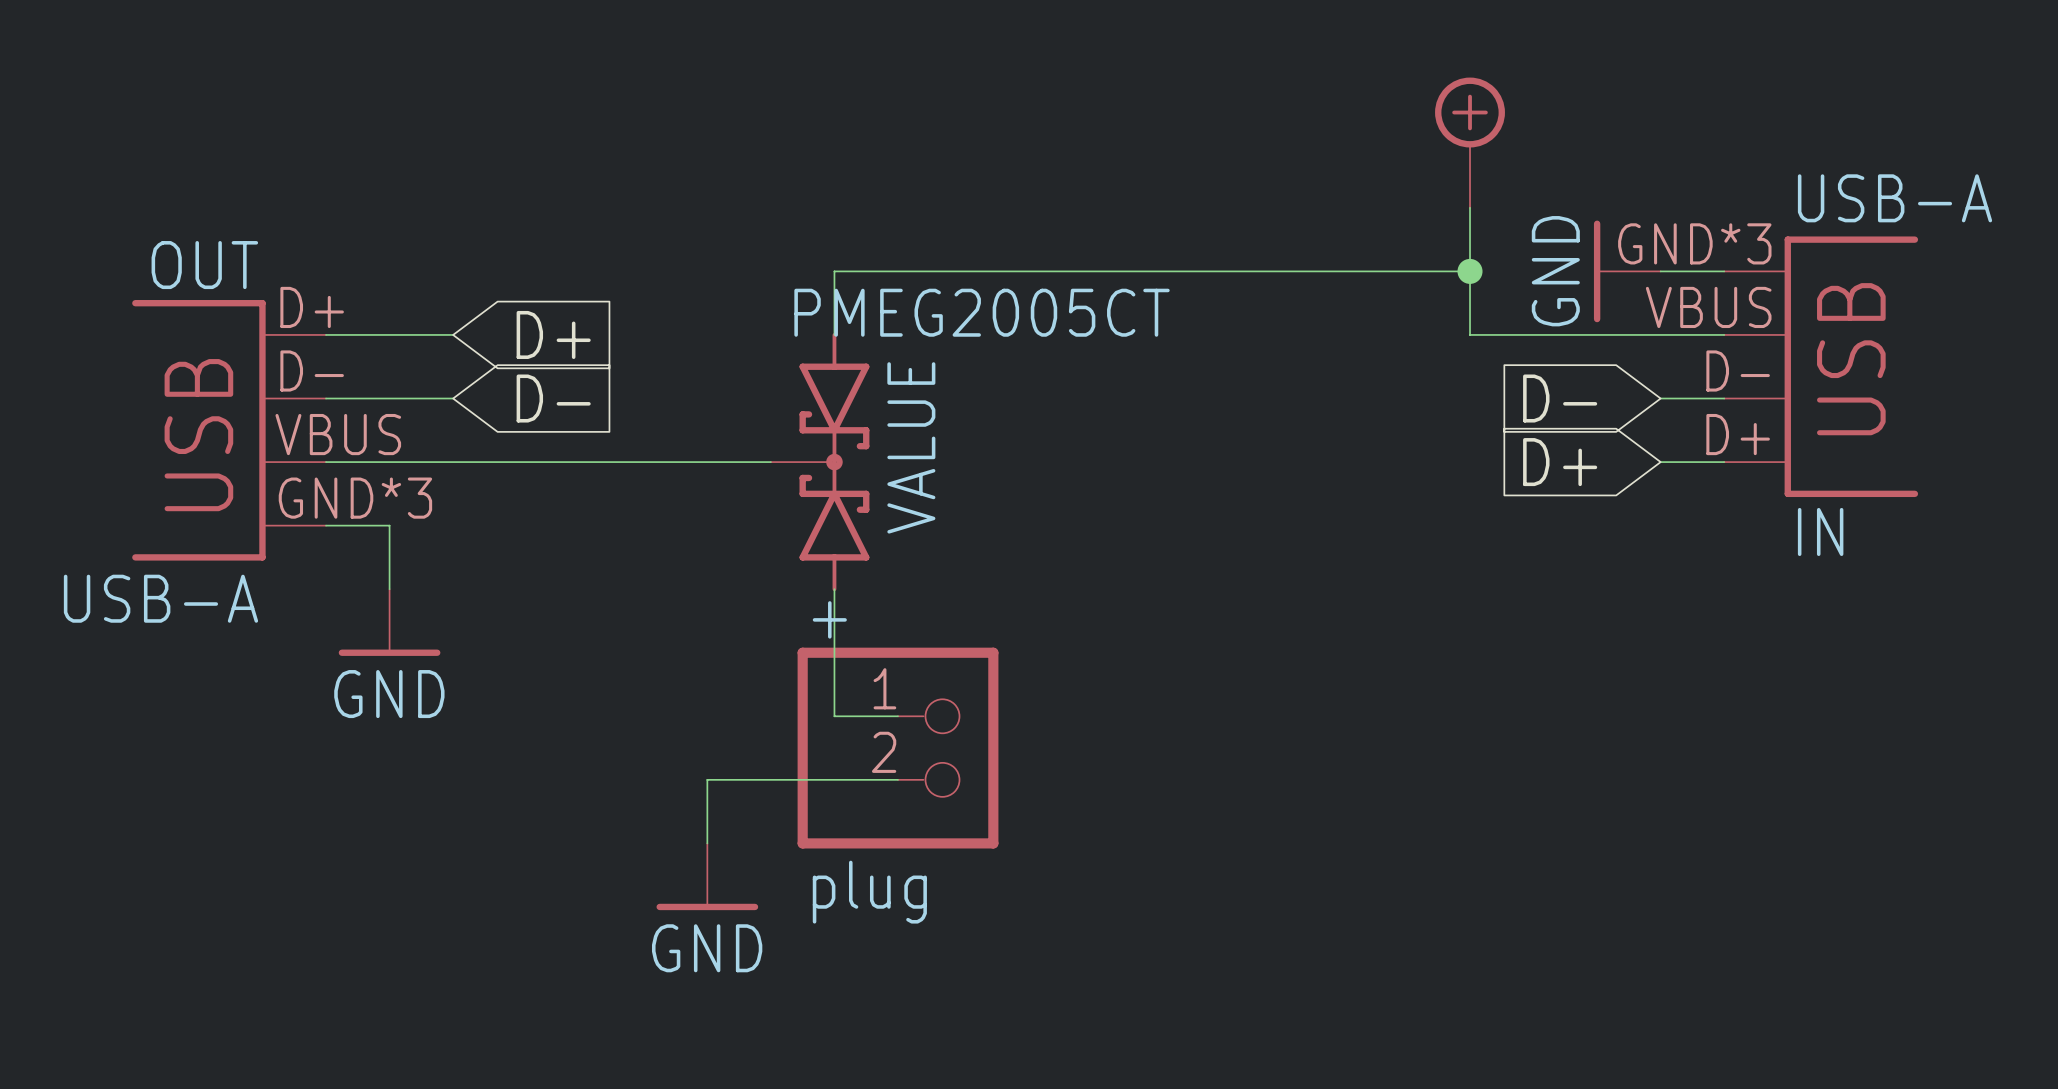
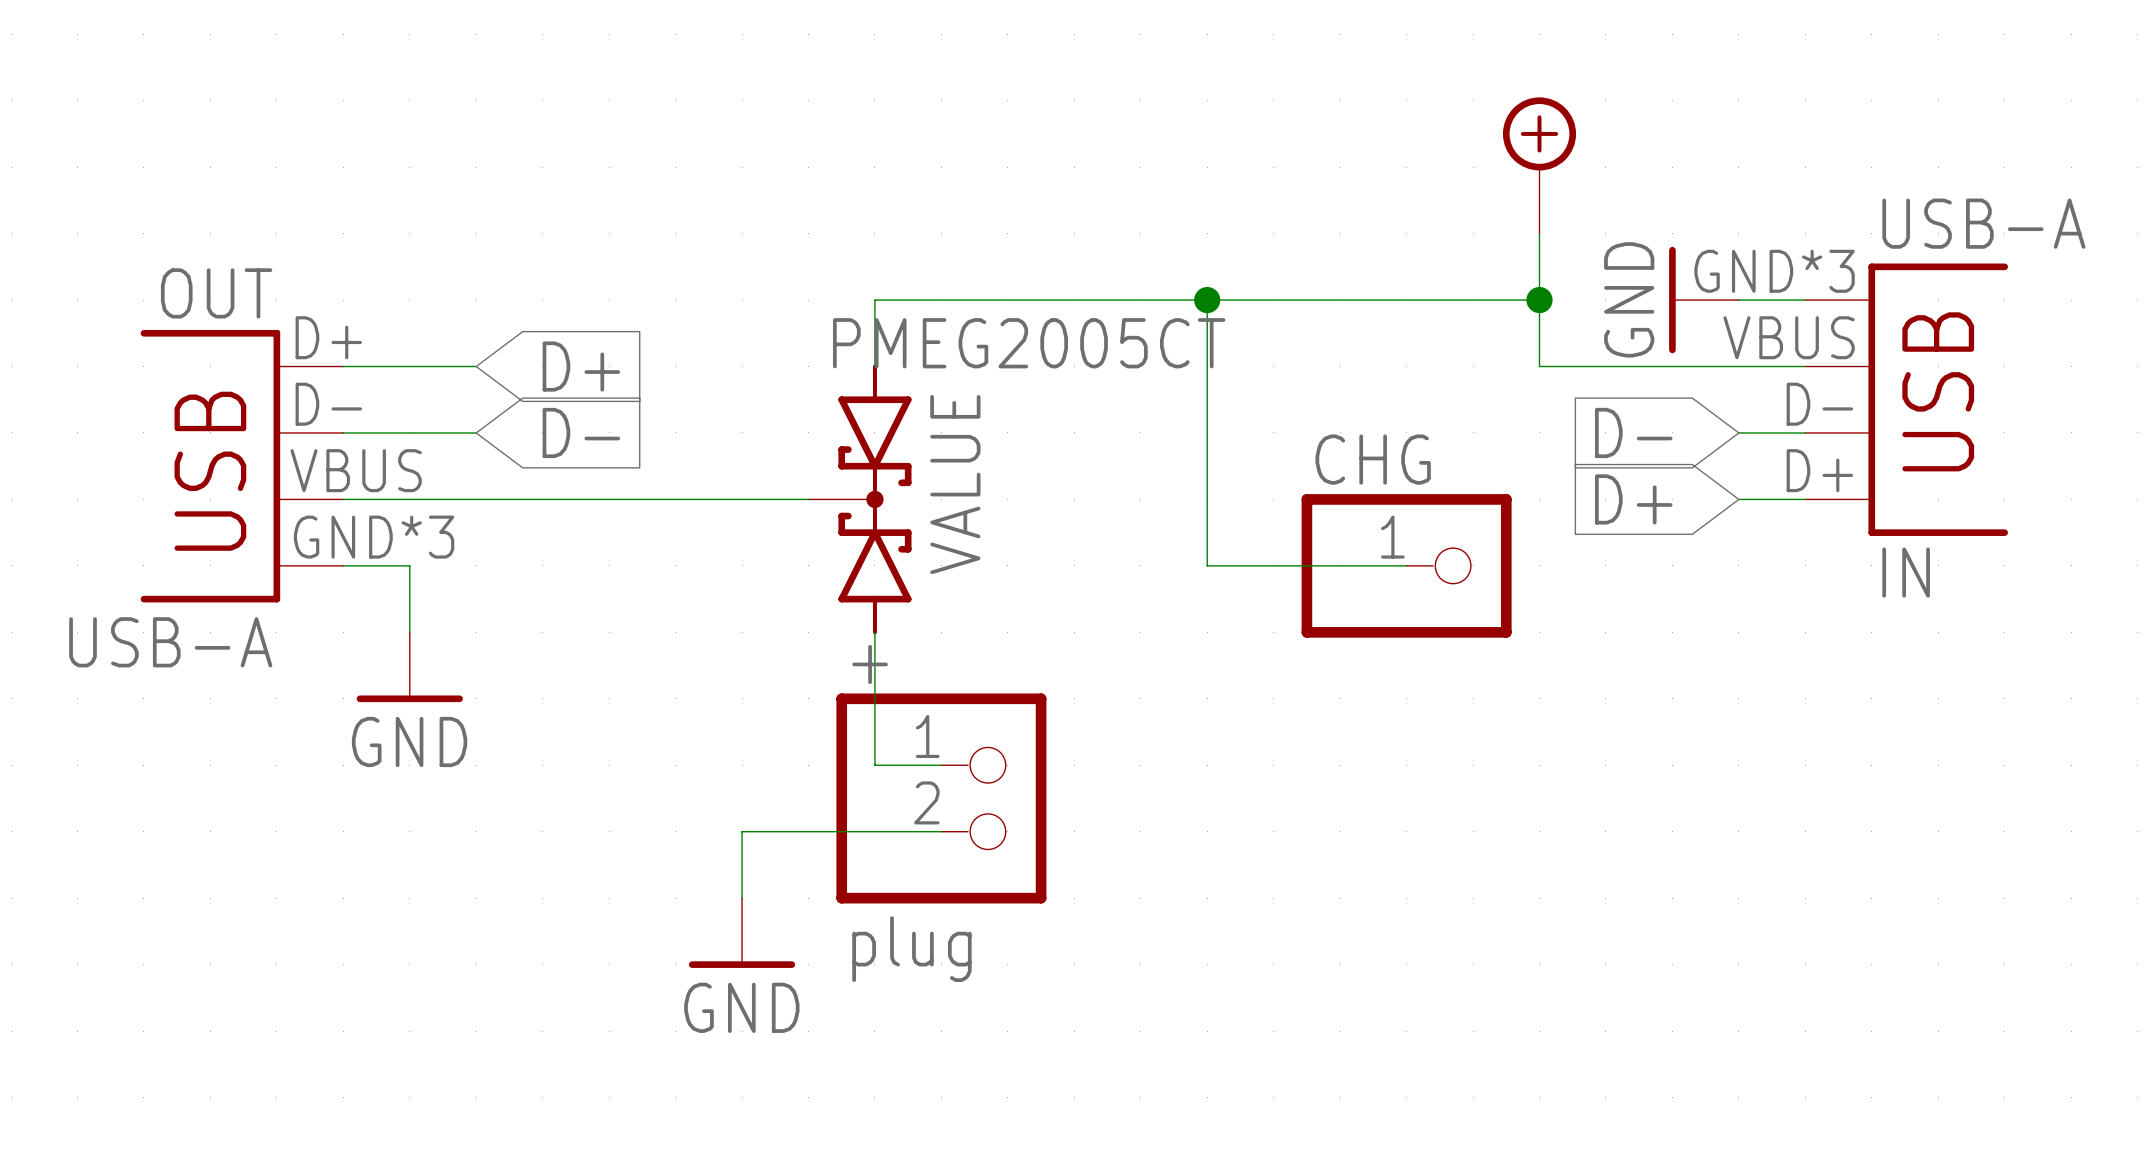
wire: none -> (1207, 300) (1207, 565) (1406, 565)
junction: none -> (1207, 300)
CHG: none -> (1406, 565)

